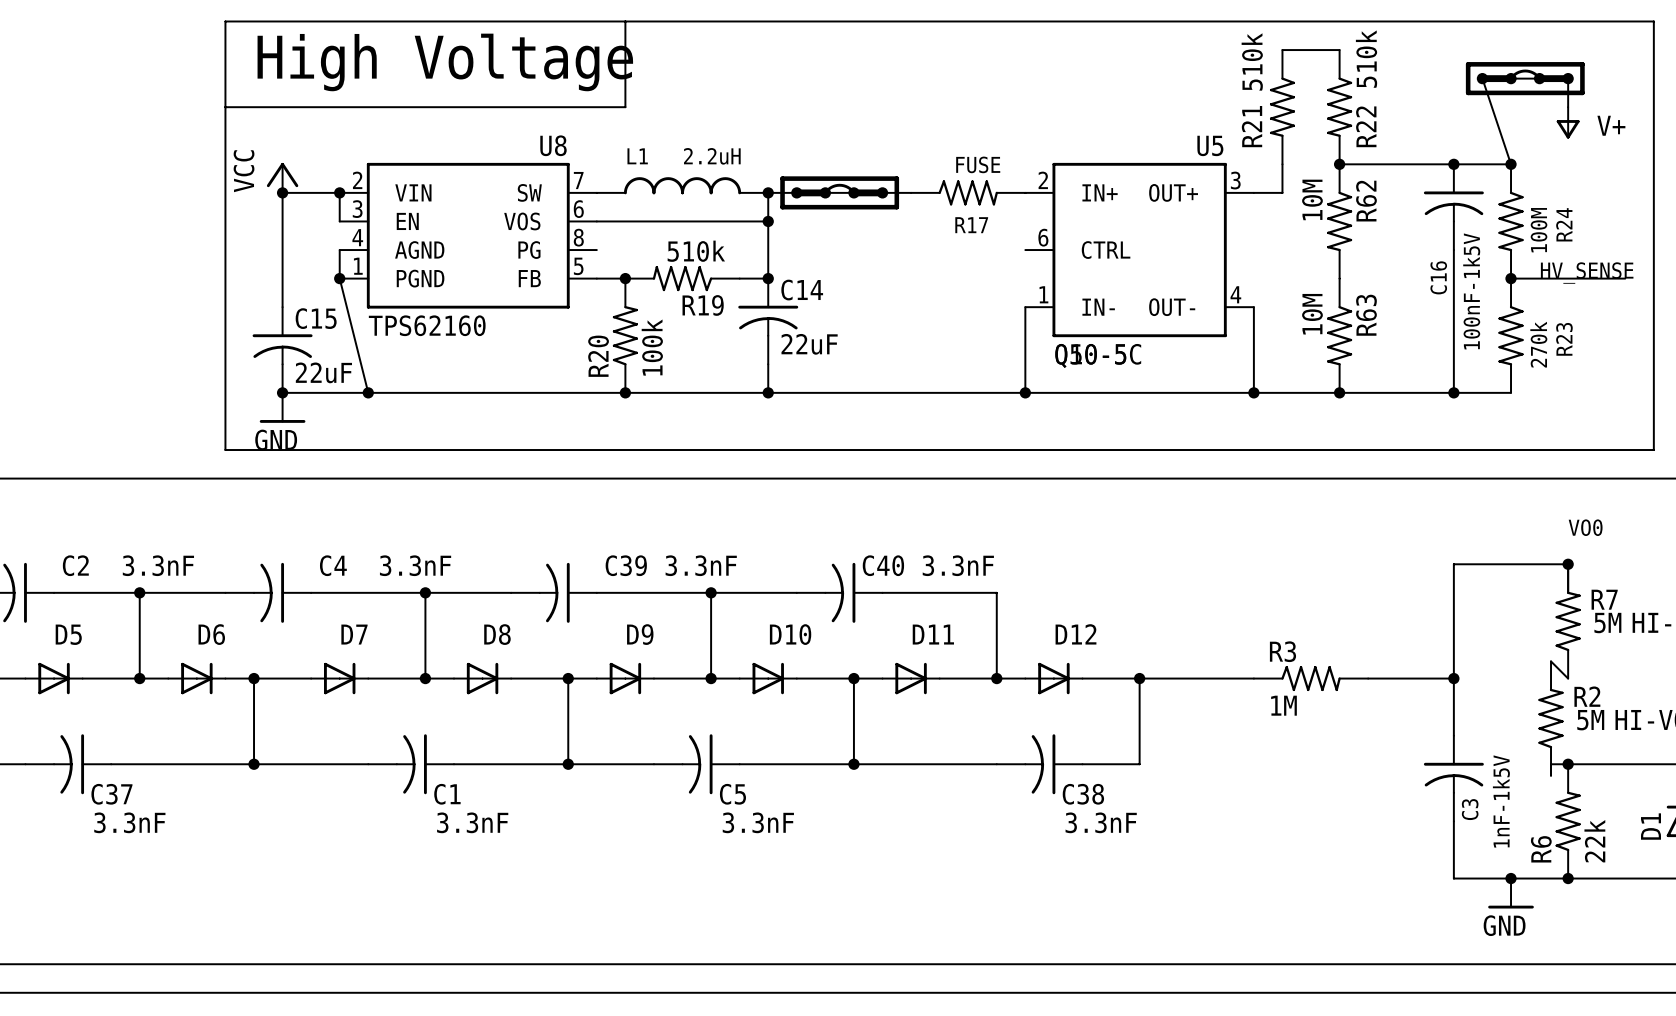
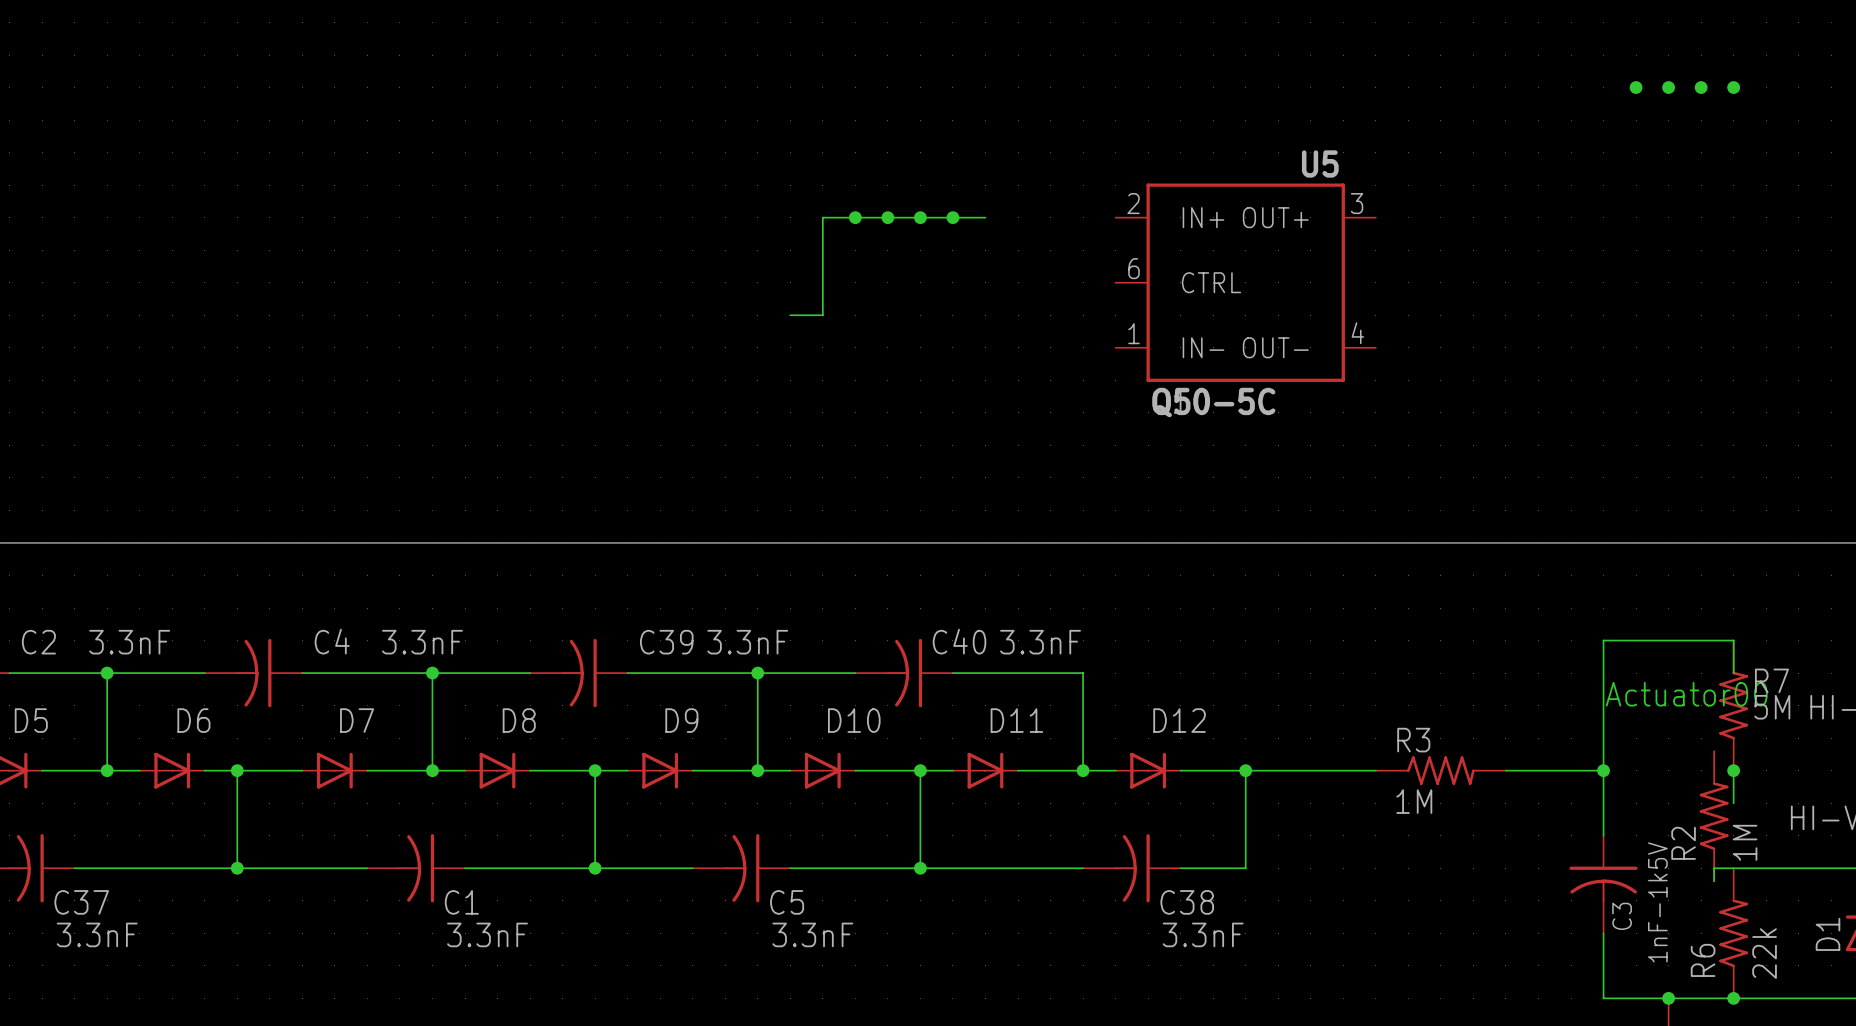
bus: (225, 21) (1653, 21) (1653, 450) (225, 450) (225, 21) -> none
bus: (625, 21) (625, 107) (225, 107) -> none
wire: (1282, 50) (1339, 50) -> none
text: High Voltage (445, 62) -> none
part: (1525, 78) -> none
R21: 510k (1282, 107) -> none
R22: 510k (1339, 107) -> none
wire: (1568, 107) (1568, 78) (1482, 78) (1511, 164) (1339, 164) -> none
power symbol: V+ (1568, 122) -> none
wire: (1282, 164) (1282, 192) (1253, 192) -> none
junction: (1339, 164) -> none
junction: (1453, 164) -> none
junction: (1511, 164) -> none
power symbol: VCC (282, 177) -> none
L1: 2.2uH (682, 185) -> none
junction: (282, 192) -> none
junction: (339, 192) -> none
junction: (768, 192) -> none
part: (839, 192) -> none
R17: FUSE (968, 192) -> none
C16: 100nF-1k5V (1453, 207) -> none
wire: (339, 221) (339, 192) (282, 192) (282, 307) -> none
wire: (596, 221) (768, 221) -> none
junction: (768, 221) -> none
R62: 10M (1339, 221) -> none
R24: 100M (1511, 221) -> none
U8: TPS62160 (468, 235) -> none
wire: (339, 250) (339, 278) (368, 392) -> none
wire: (1453, 250) (1453, 392) -> none
label: HV_SENSE (1587, 273) -> none
junction: (339, 278) -> none
wire: (596, 278) (625, 278) -> none
junction: (625, 278) -> none
R19: 510k (682, 278) -> none
junction: (768, 278) -> none
wire: (1511, 278) (1625, 278) -> none
junction: (1511, 278) -> none
wire: (1025, 307) (1025, 392) -> none
wire: (1253, 307) (1253, 392) -> none
C14: 22uF (768, 321) -> none
R20: 100k (625, 335) -> none
R63: 10M (1339, 335) -> none
R23: 270k (1511, 335) -> none
C15: 22uF (282, 350) -> none
wire: (768, 364) (768, 392) -> none
wire: (282, 392) (1511, 392) -> none
junction: (282, 392) -> none
junction: (368, 392) -> none
junction: (625, 392) -> none
junction: (768, 392) -> none
junction: (1025, 392) -> none
junction: (1253, 392) -> none
junction: (1339, 392) -> none
junction: (1453, 392) -> none
power symbol: GND (282, 407) -> none
label: VO0 (1585, 527) -> none
junction: (1568, 564) -> none
text: none -> Actuator00 (1686, 694)
wire: (1551, 661) (1568, 678) -> (1733, 803) (1733, 770)
junction: none -> (1733, 770)
R2 name rotation: 0° (1587, 696) -> 90° counterclockwise (1683, 843)
R2 name position: R2 (1587, 696) -> R2 (1683, 843)
R2 value: 5M (1590, 720) -> 1M (1745, 842)
junction: (1568, 764) -> none

